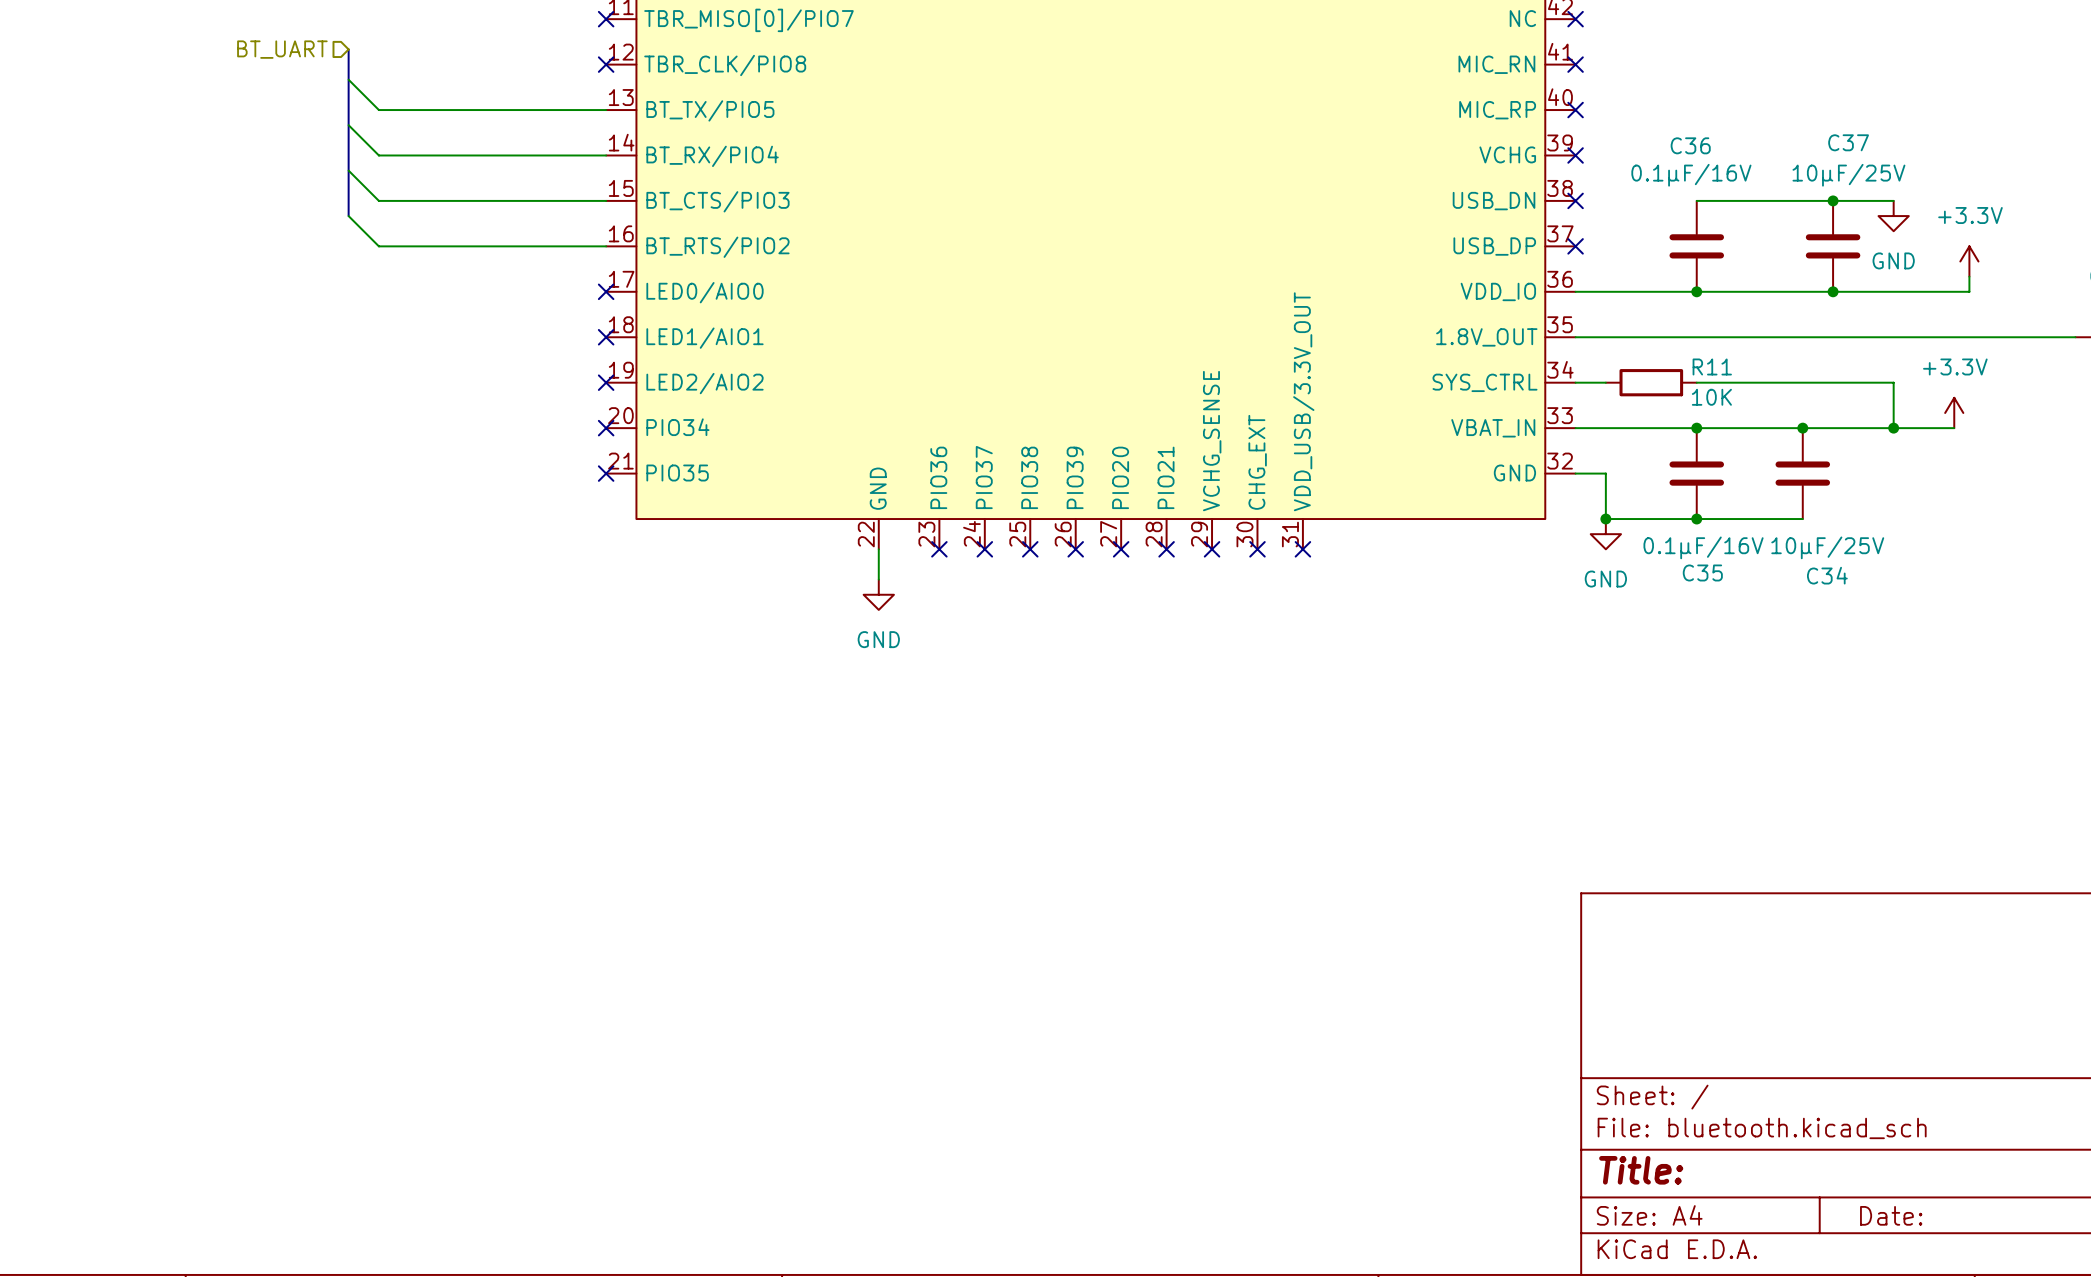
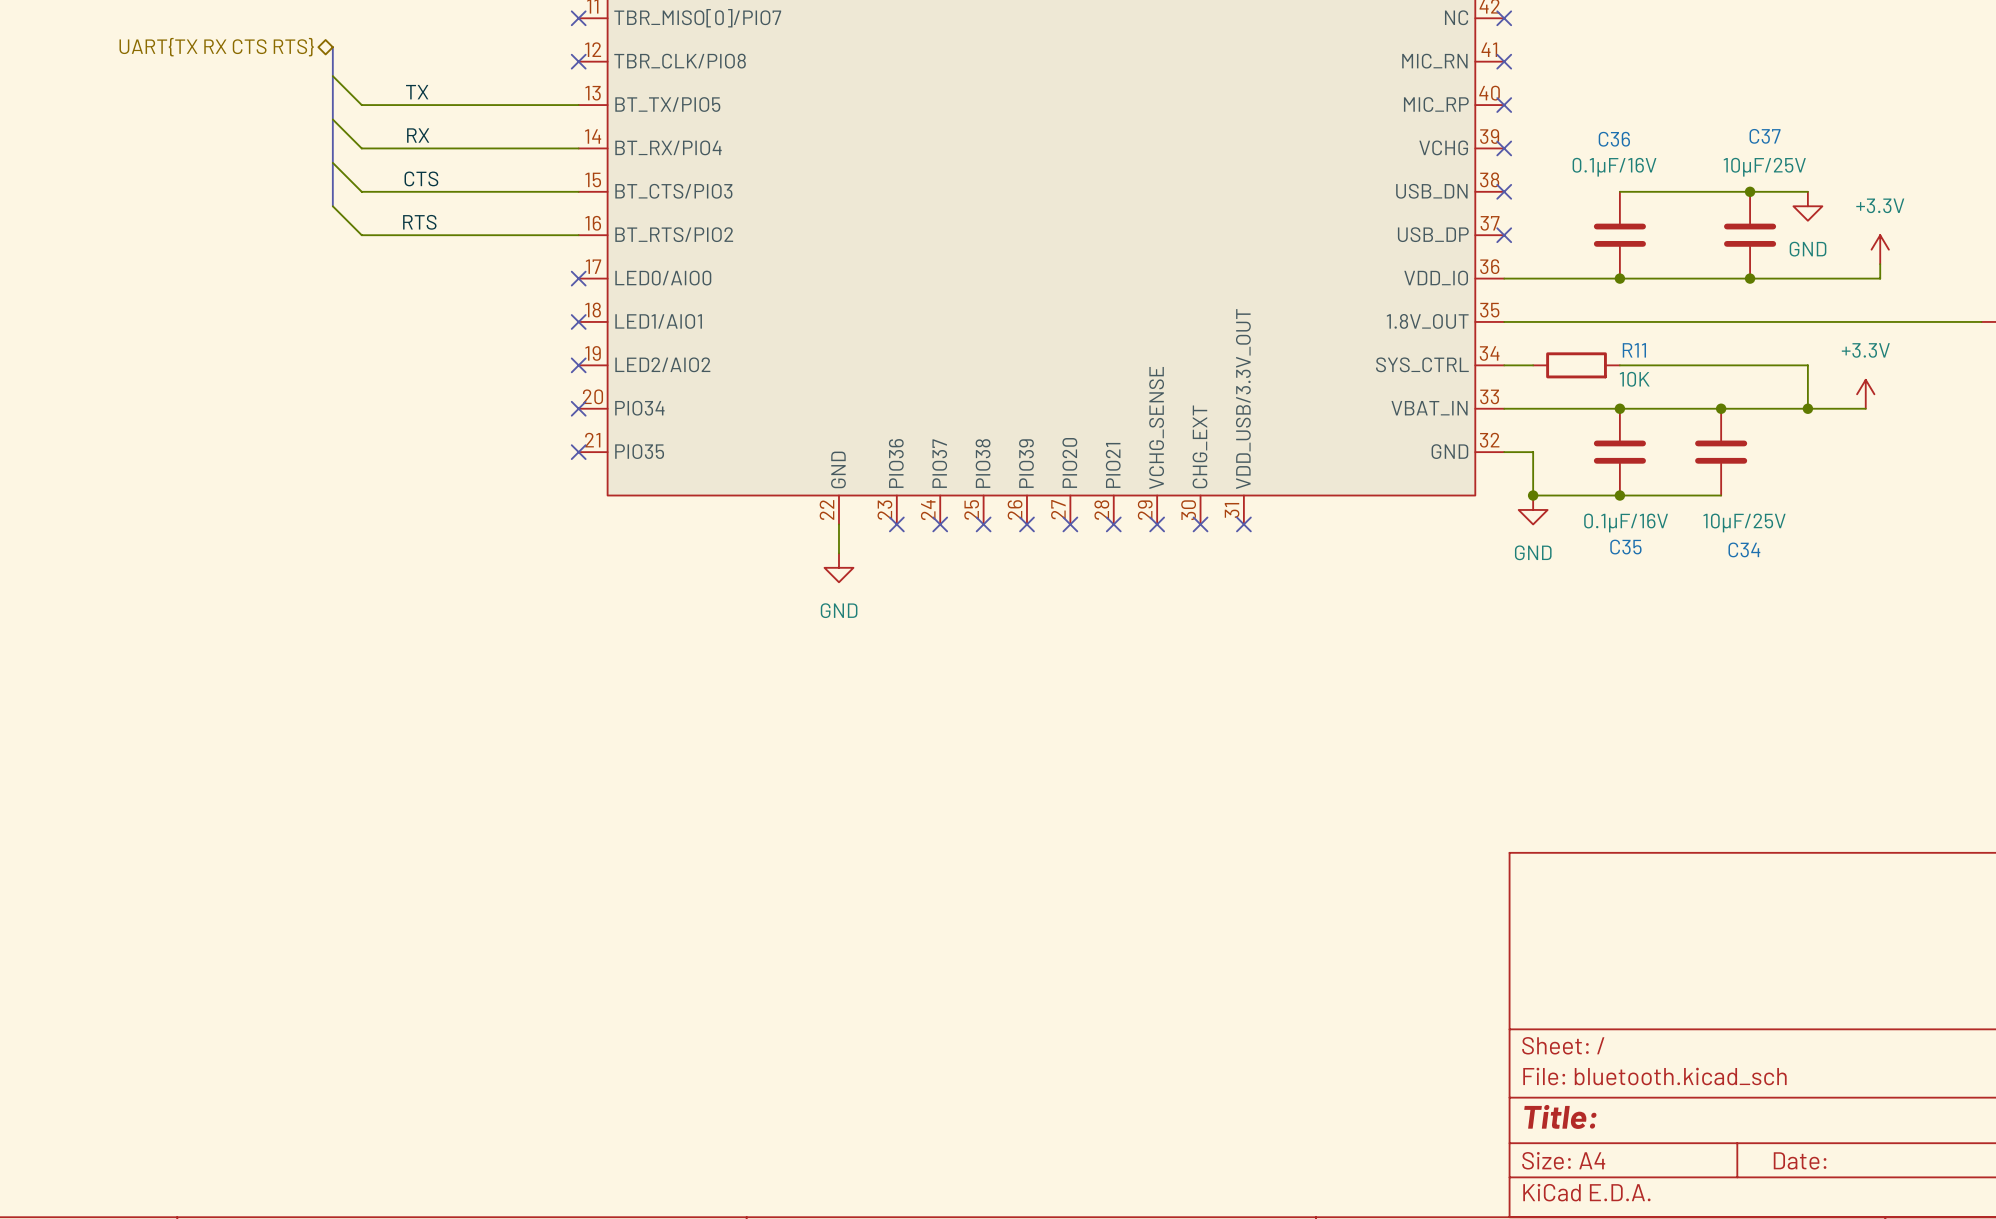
hierarchical label shape: input (282, 49) -> bidirectional (216, 47)
hierarchical label: BT_UART (282, 49) -> UART{TX RX CTS RTS} (216, 47)
label: none -> TX (417, 92)
label: none -> RX (418, 135)
label: none -> CTS (421, 178)
label: none -> RTS (419, 222)

